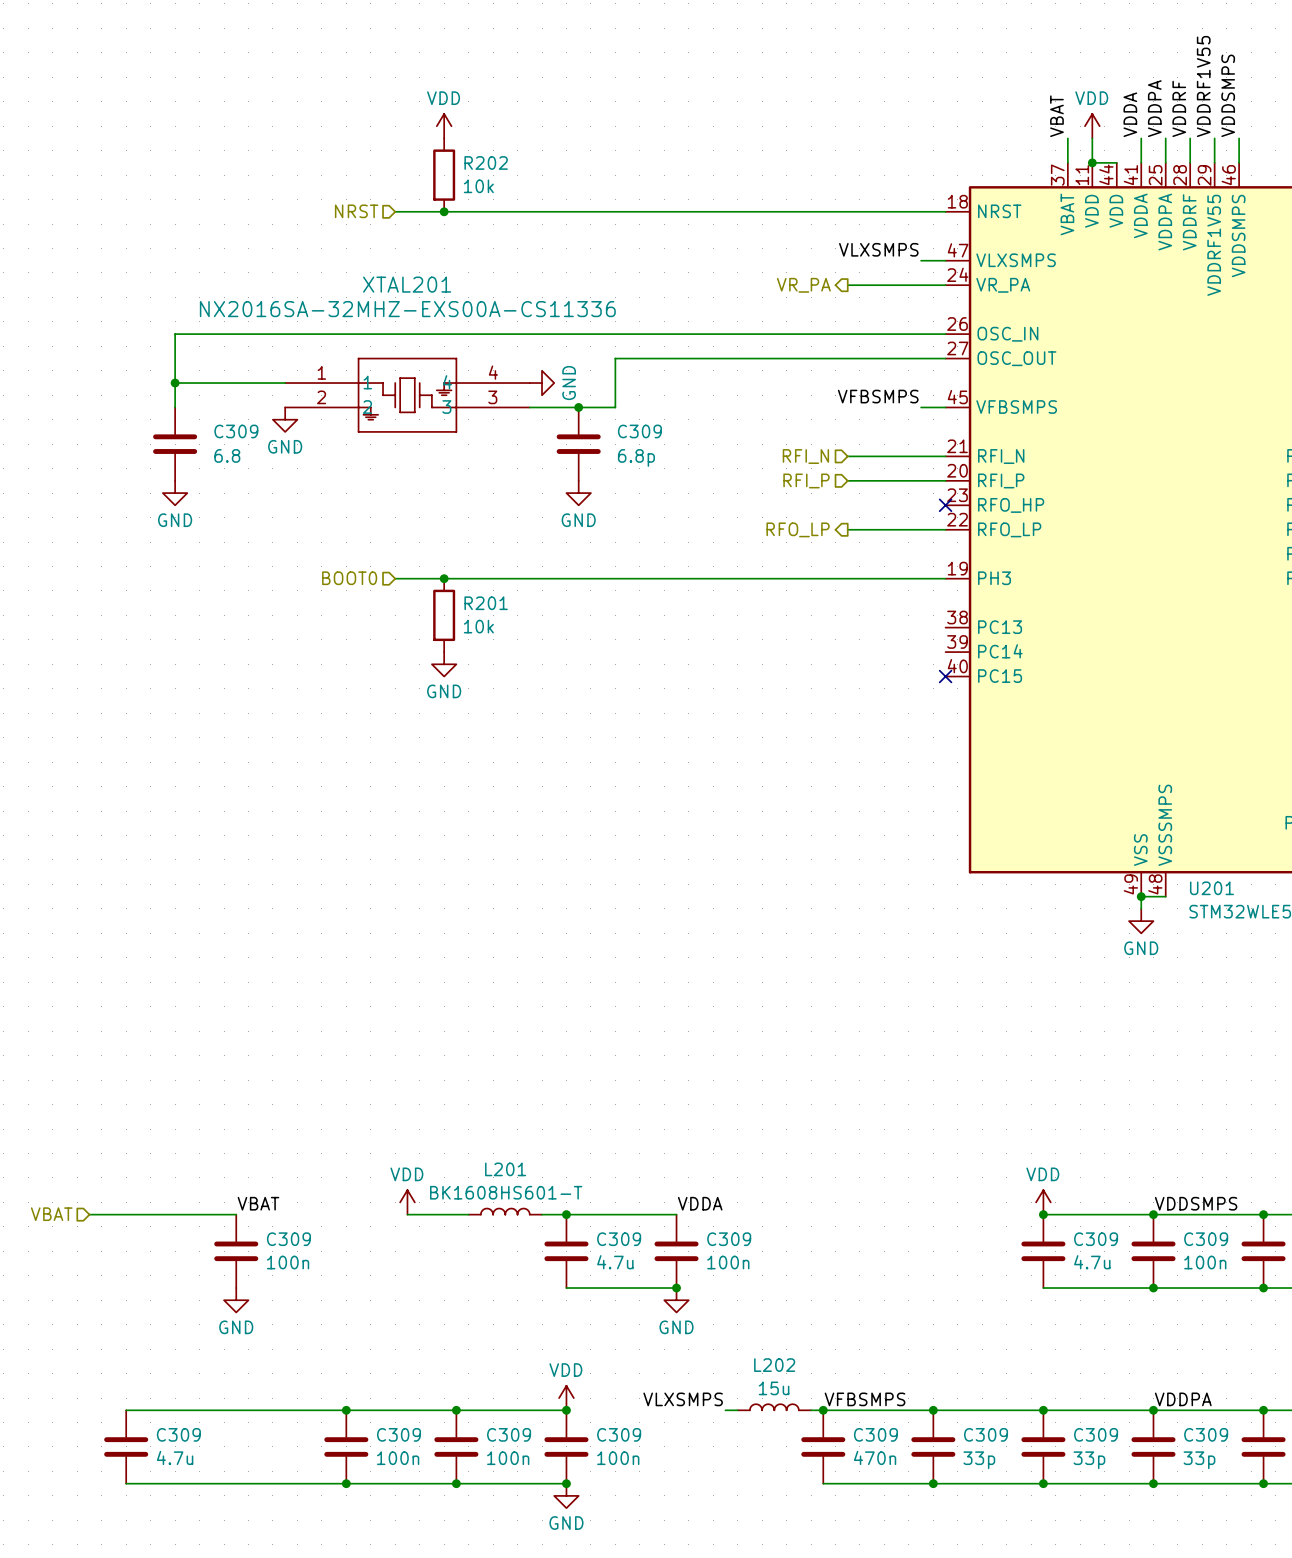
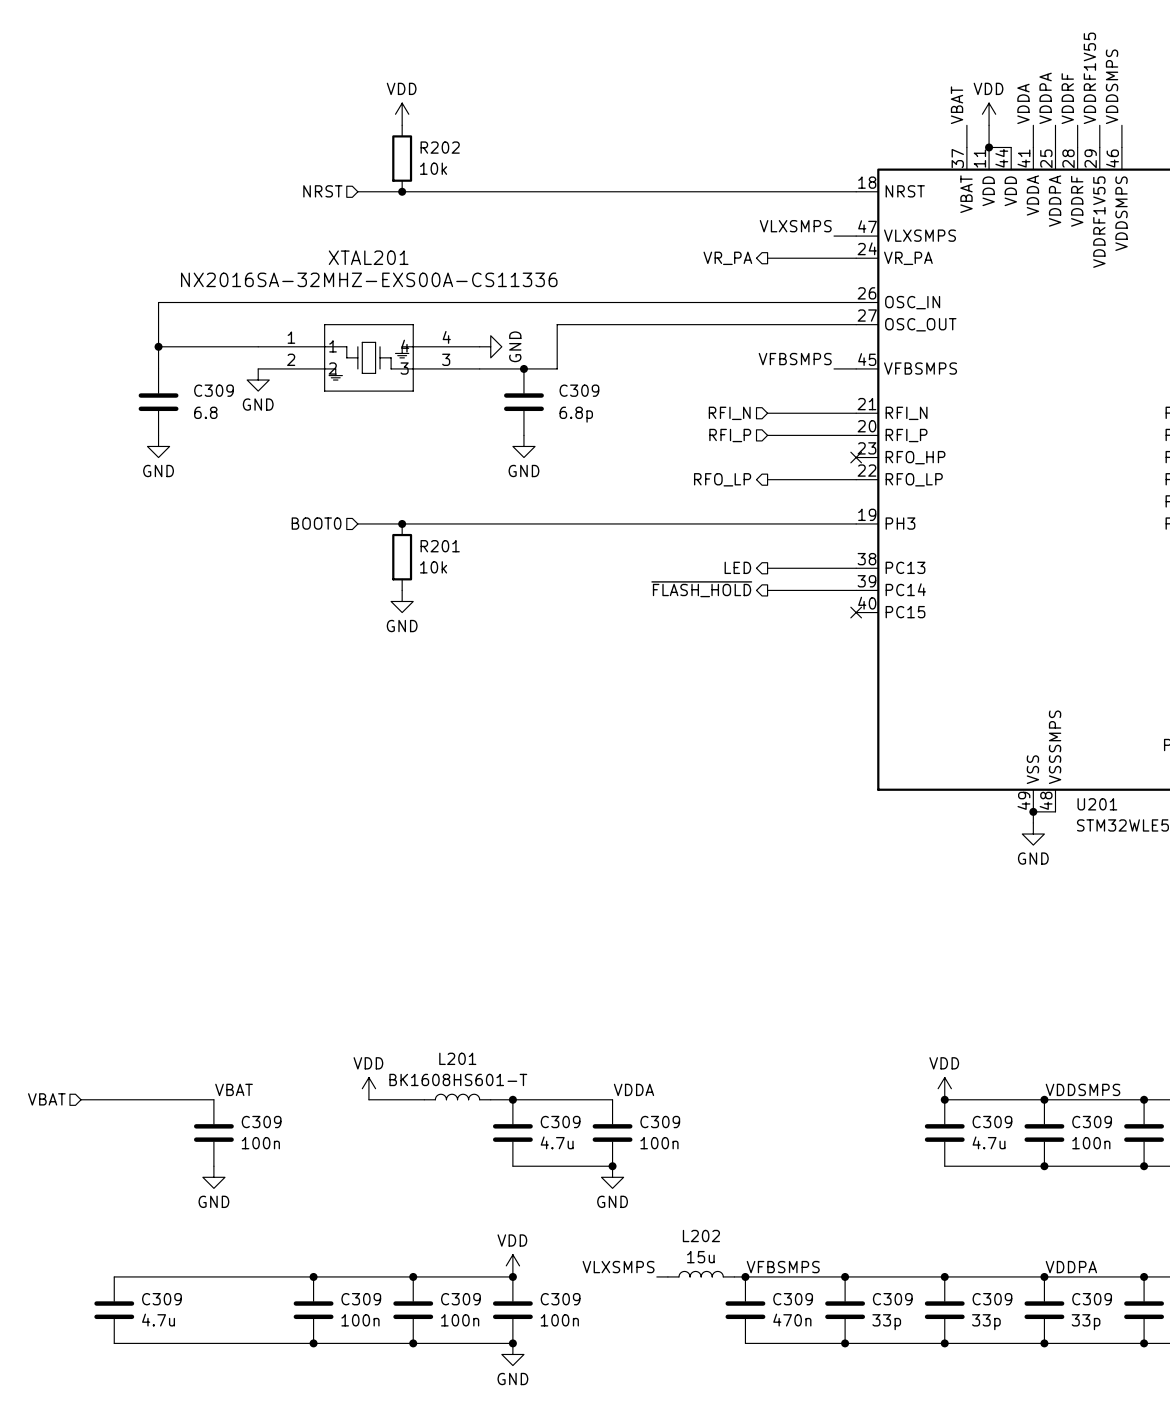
hierarchical label: none -> LED (737, 567)
wire: none -> (767, 568) (856, 568)
hierarchical label: none -> ~{FLASH_HOLD} (701, 589)
wire: none -> (767, 590) (856, 590)

